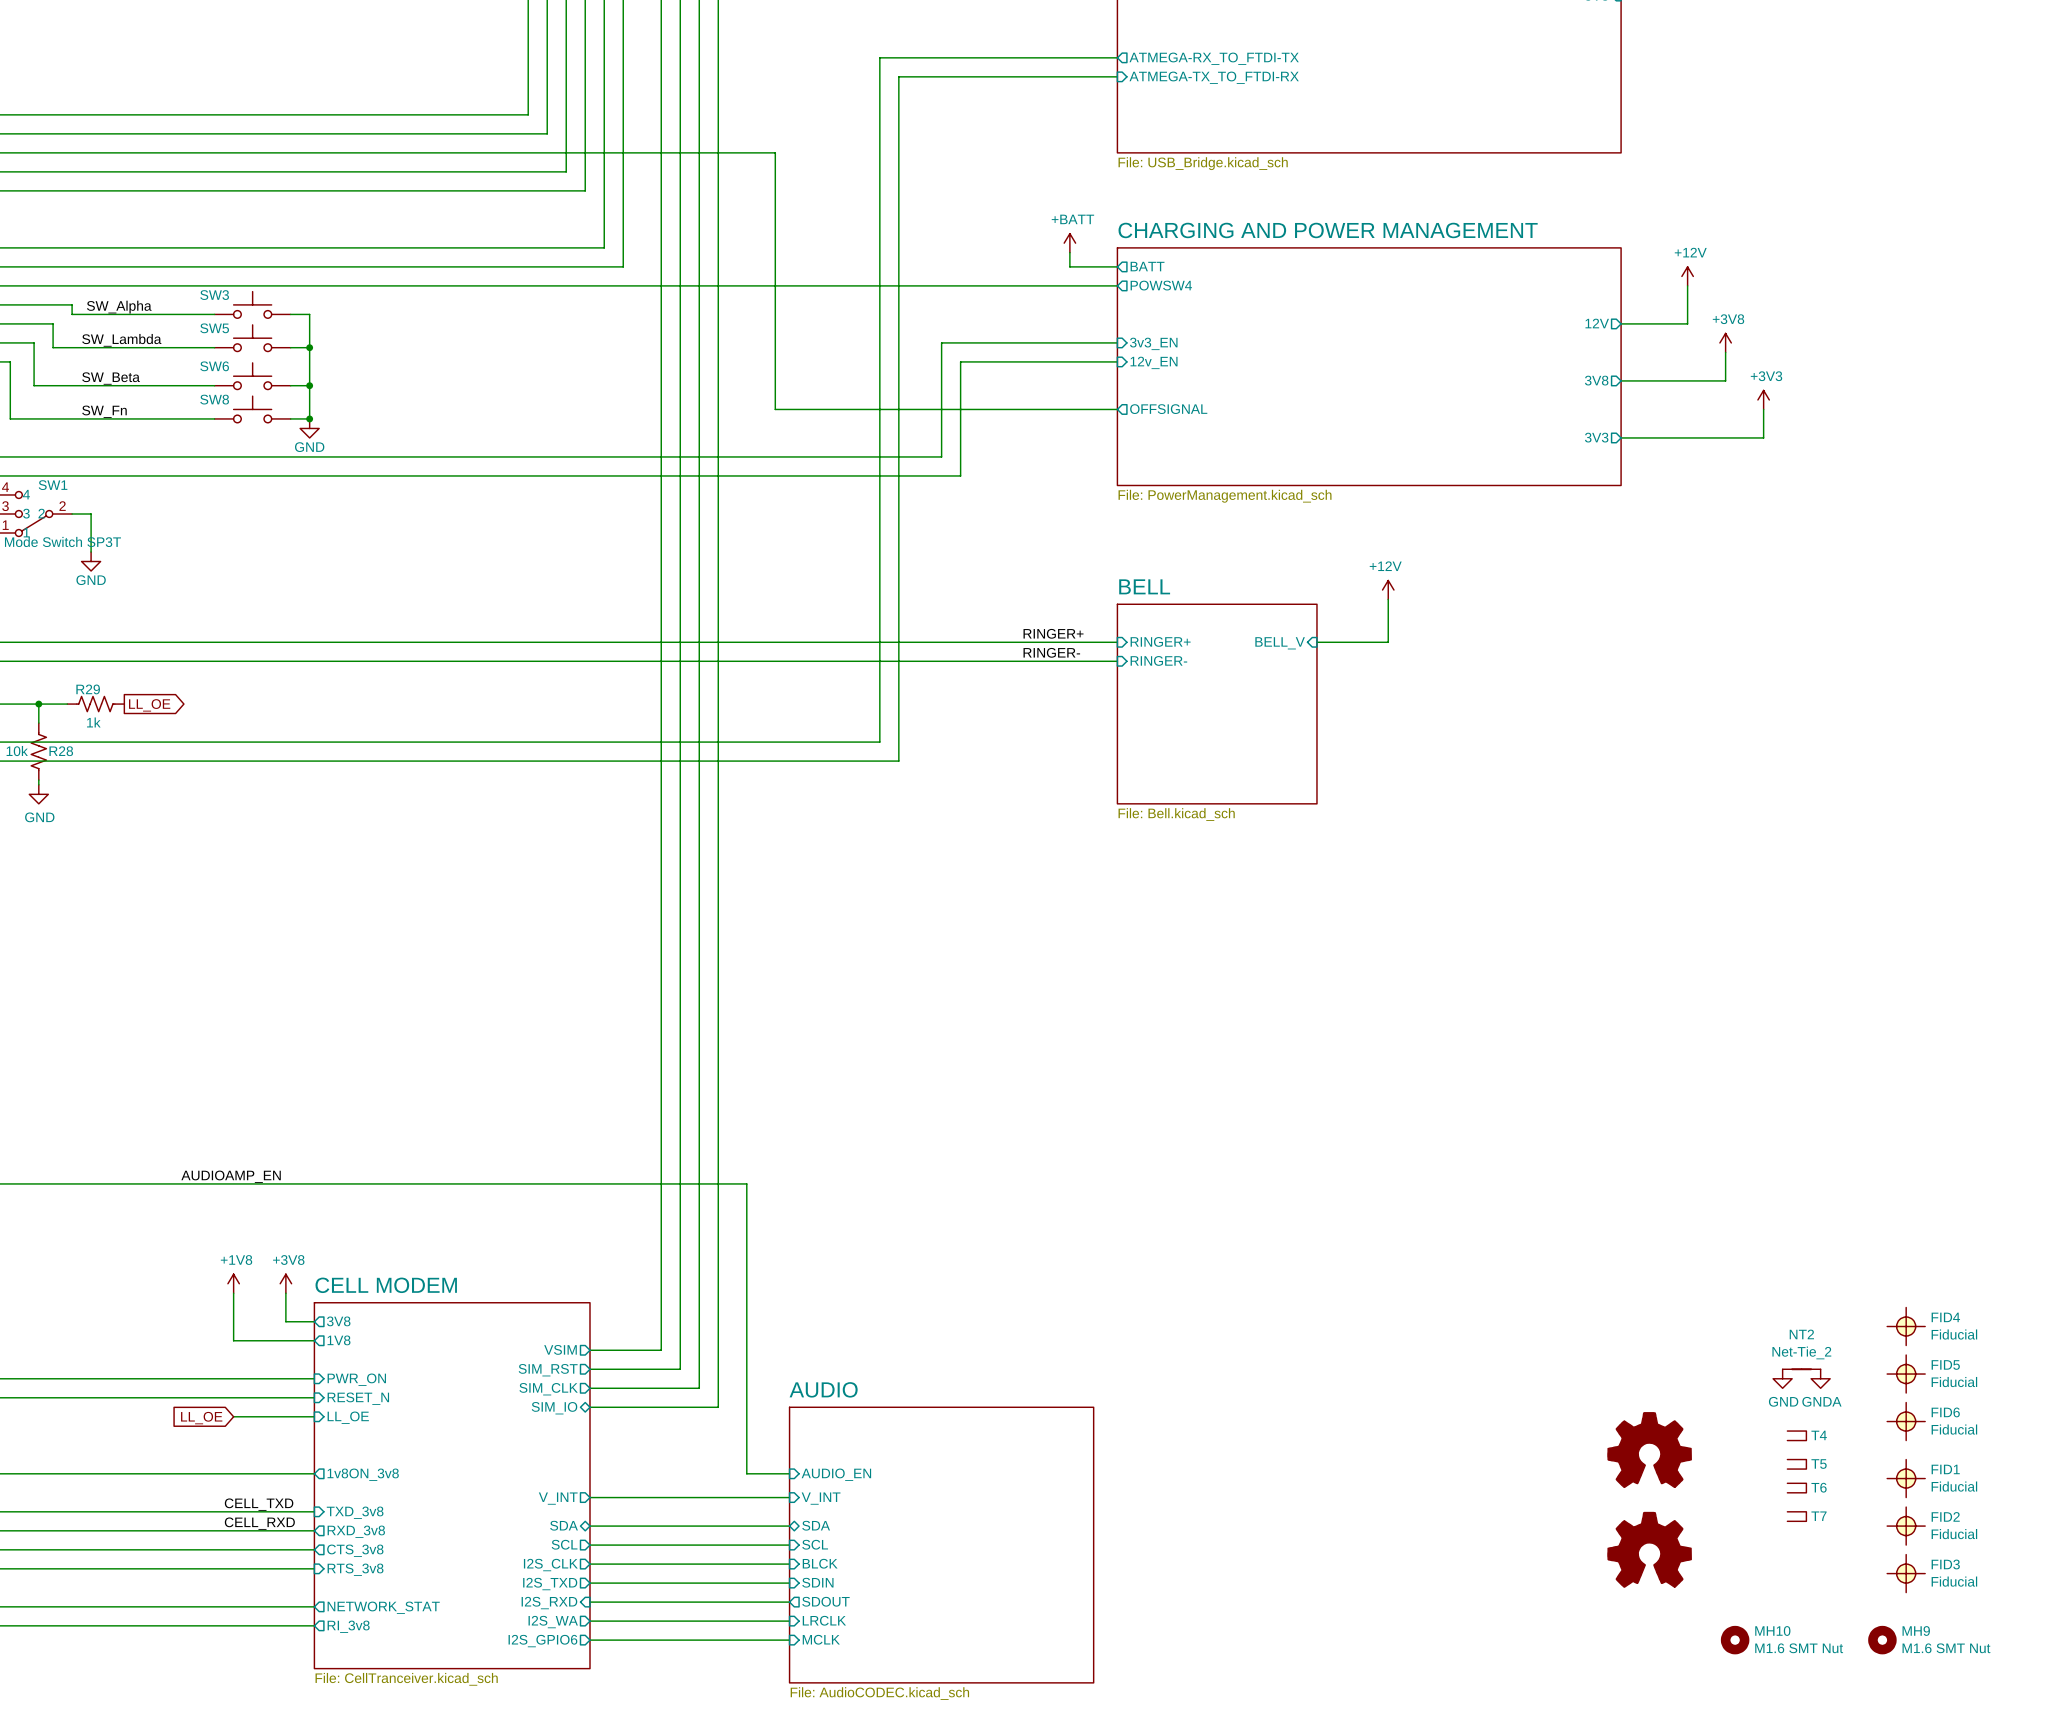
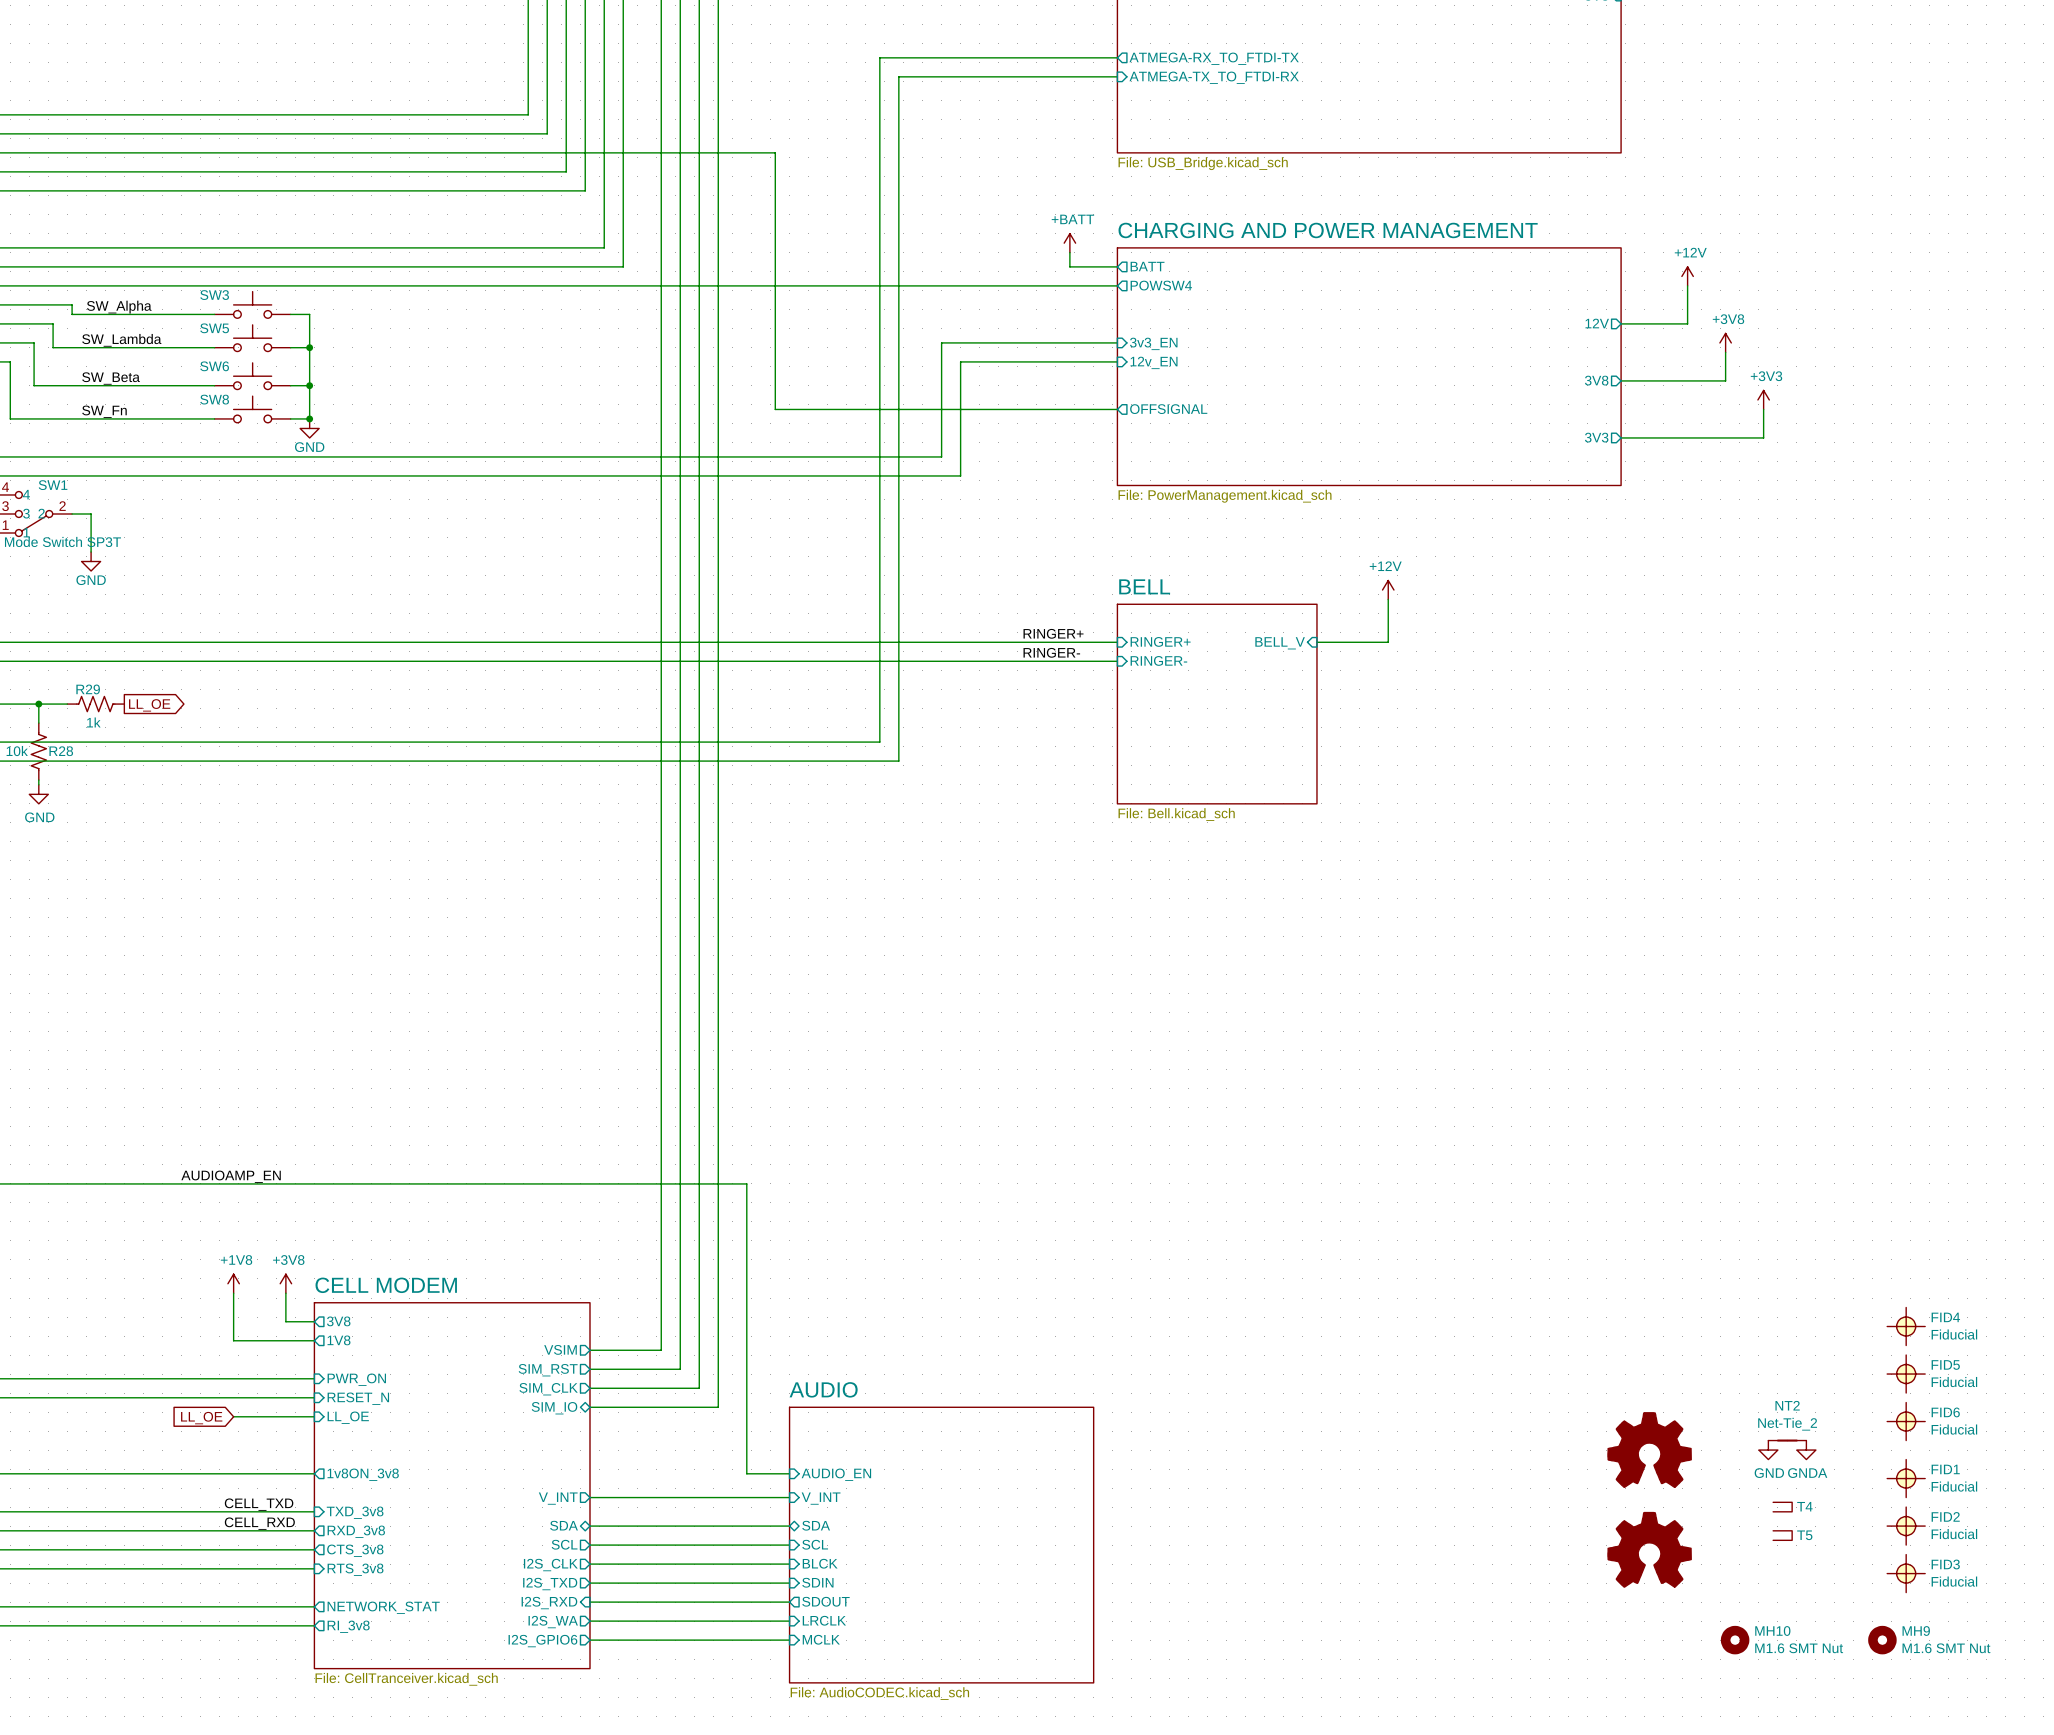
NT2 position: (1801, 1369) -> (1787, 1440)
power symbol position: GND (1782, 1378) -> GND (1768, 1450)
power symbol position: GNDA (1820, 1378) -> GNDA (1806, 1450)
T4 position: (1796, 1435) -> (1782, 1507)
T5 position: (1796, 1464) -> (1782, 1535)
T6: (1796, 1488) -> none
T7: (1796, 1516) -> none

